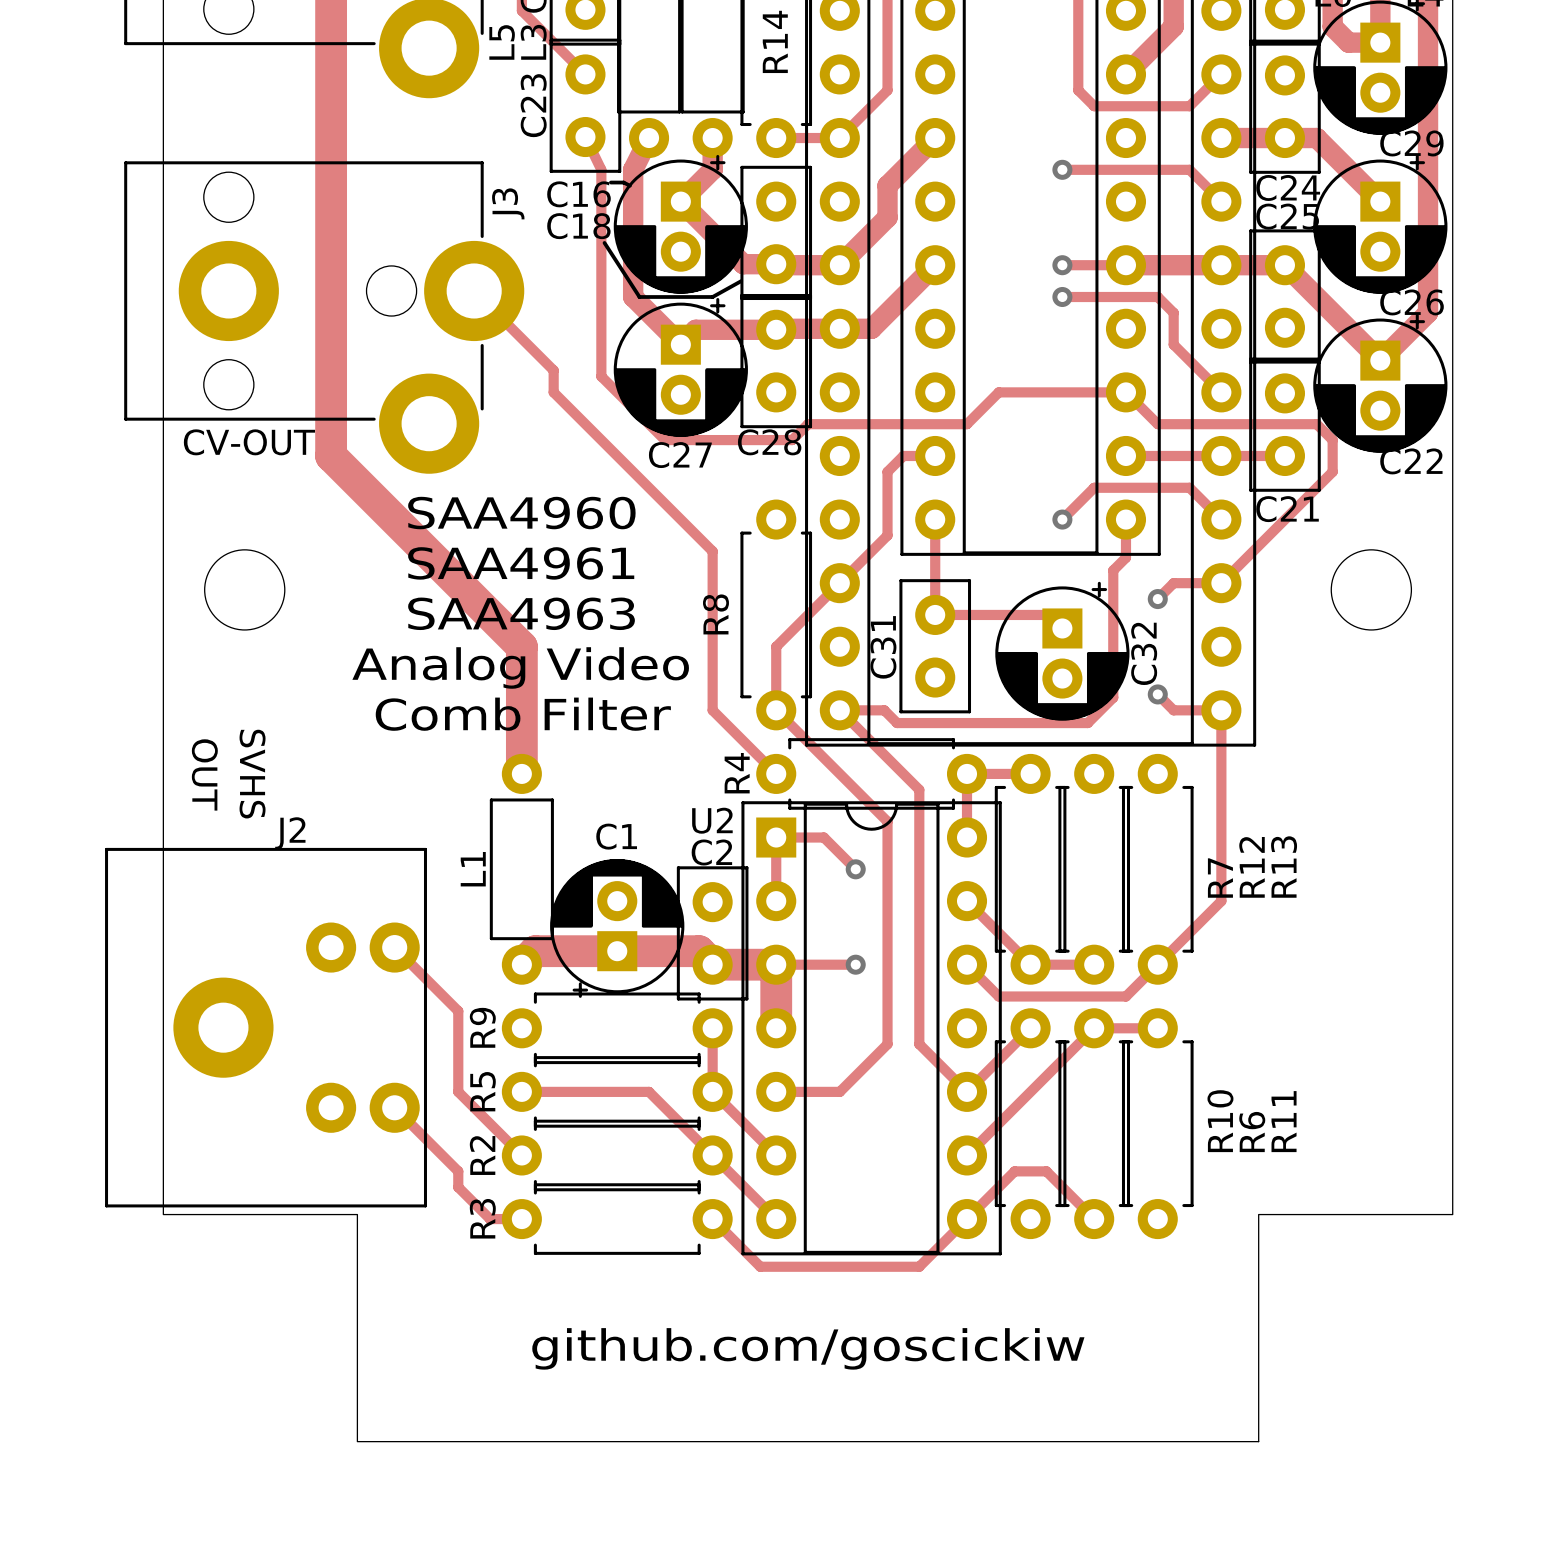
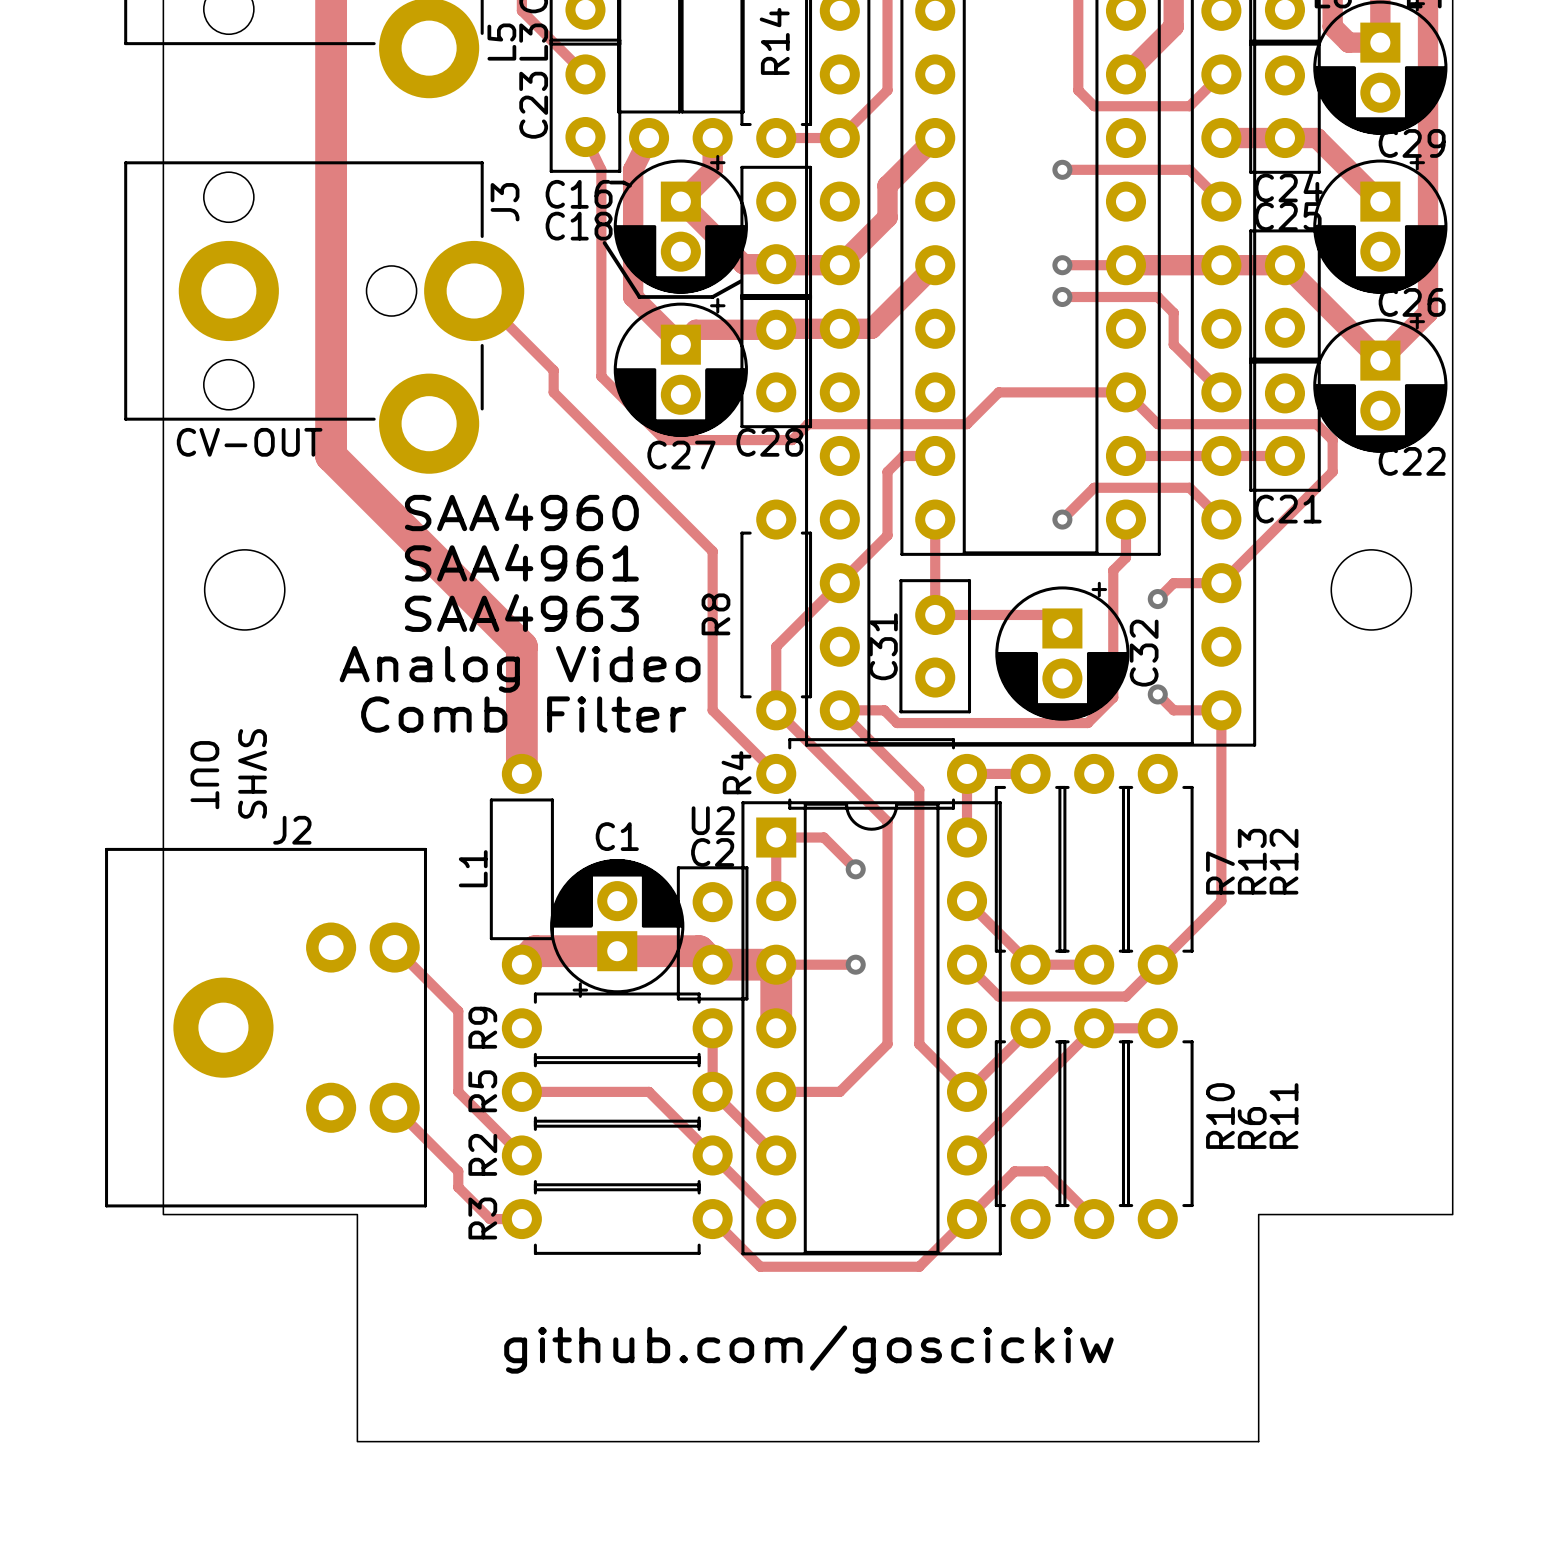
R12 name position: R12 (1252, 867) -> R12 (1284, 861)
R13 name position: R13 (1284, 867) -> R13 (1252, 861)

